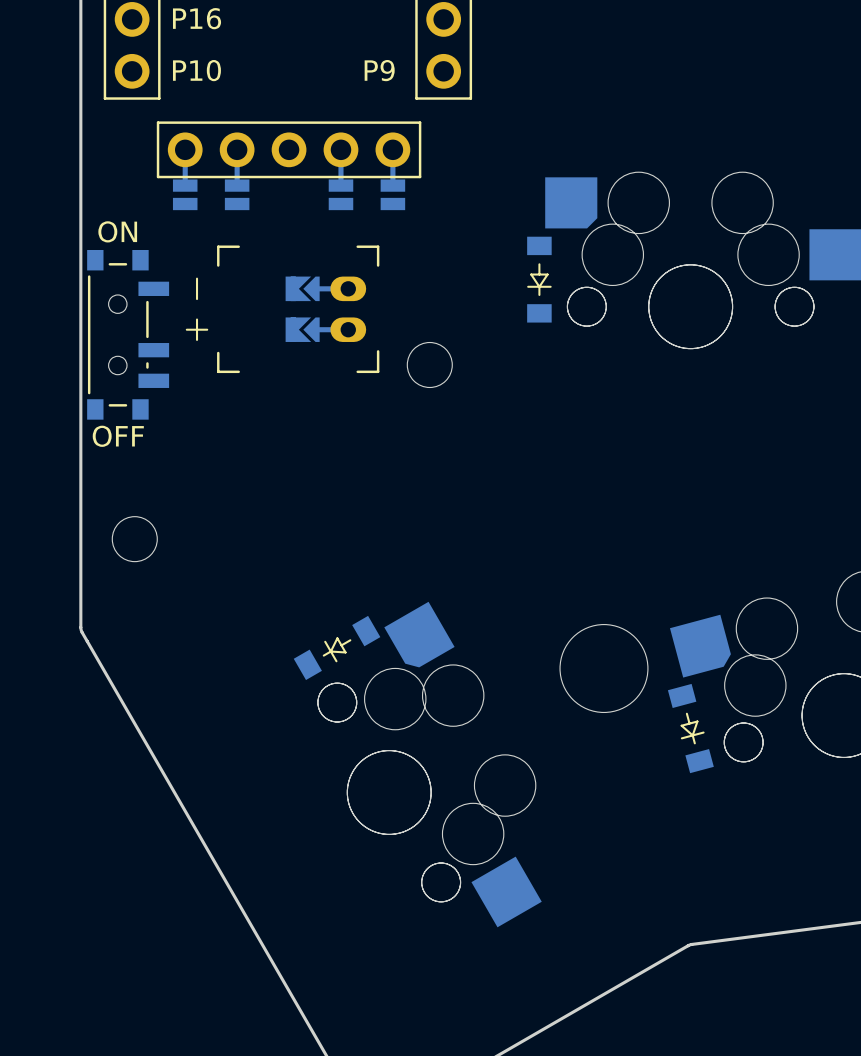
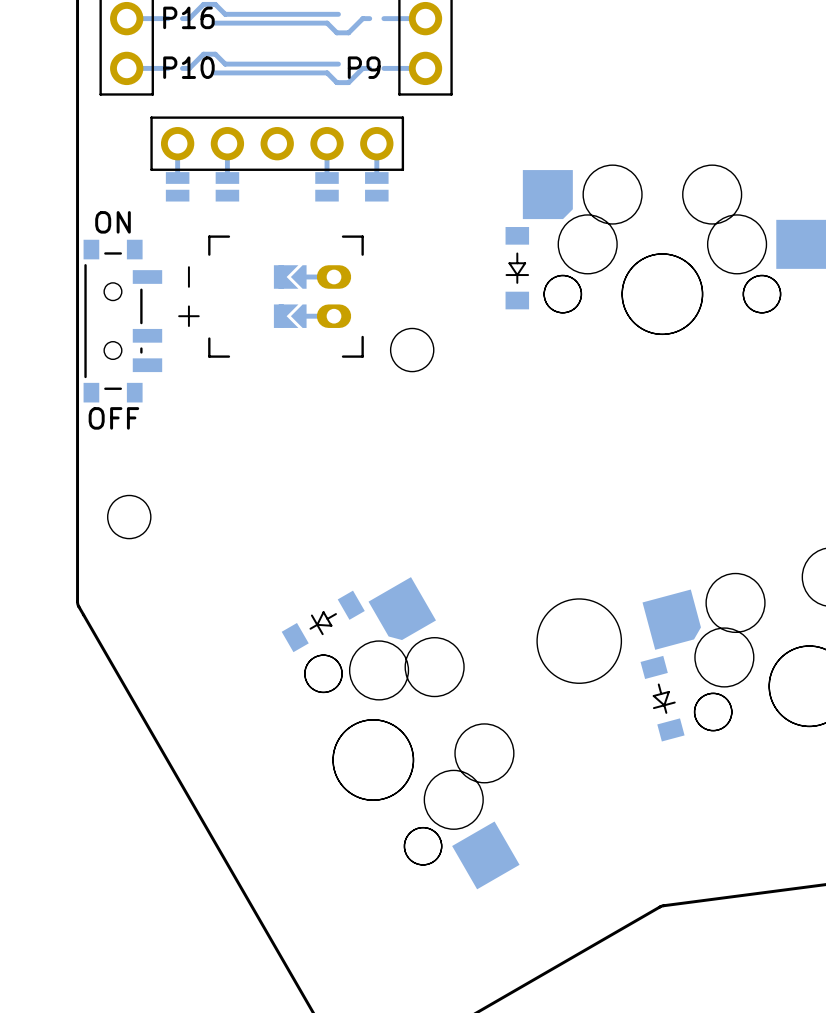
track: none -> (338, 14) (225, 14) (215, 4) (203, 4) (189, 18) (182, 18)
track: none -> (168, 18) (126, 18)
track: none -> (369, 18) (362, 18) (348, 32) (336, 32) (327, 23) (213, 23)
track: none -> (425, 18) (383, 18)
track: none -> (338, 64) (225, 64) (215, 54) (203, 54) (189, 68) (182, 68)
track: none -> (168, 68) (126, 68)
track: none -> (369, 68) (362, 68) (348, 82) (336, 82) (327, 72) (213, 72)
track: none -> (425, 68) (383, 68)

